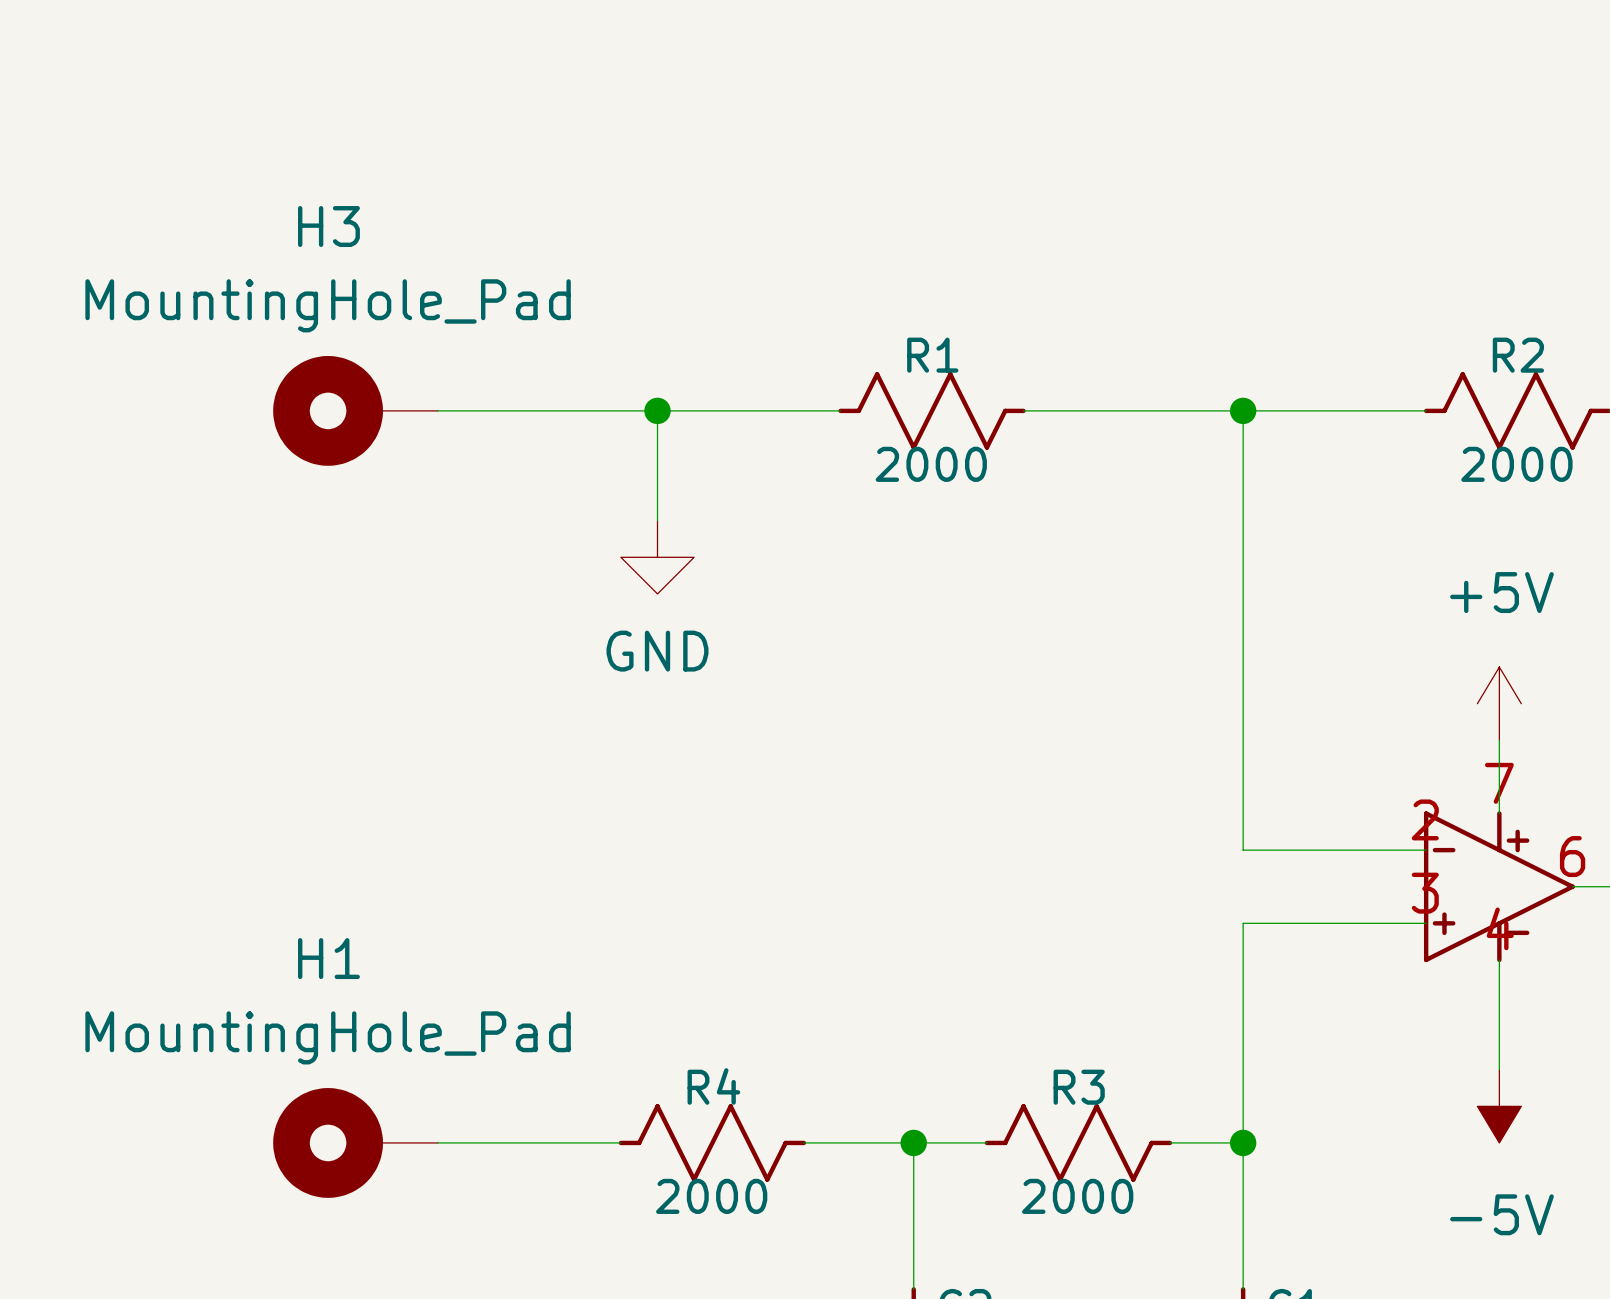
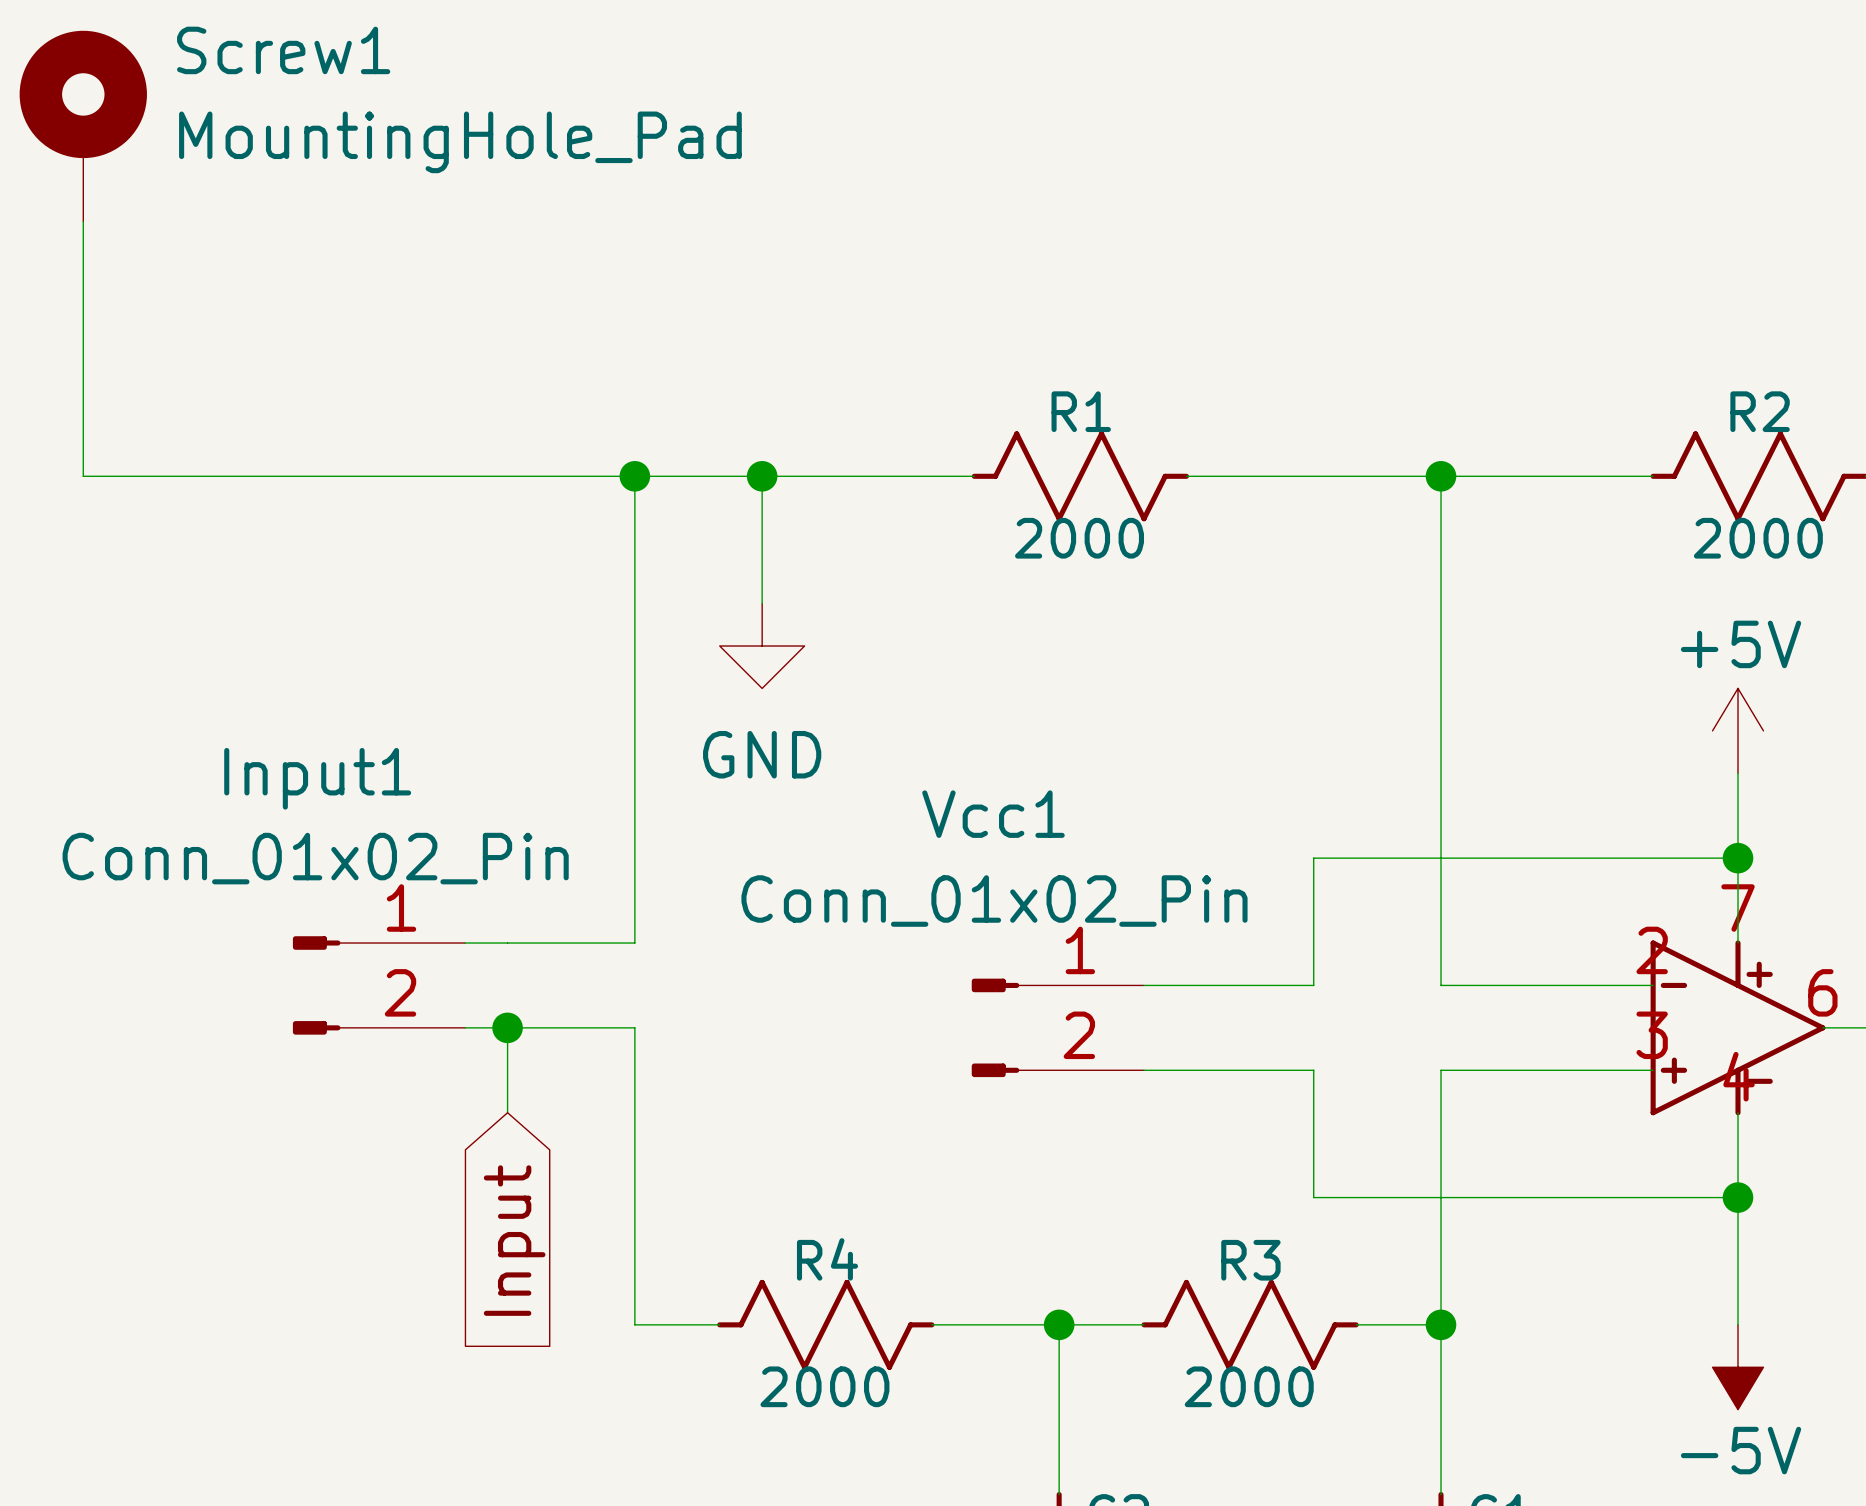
Screw1: none -> MountingHole_Pad (83, 126)
wire: none -> (83, 221) (83, 476) (507, 476)
H3: MountingHole_Pad (355, 410) -> none
wire: none -> (634, 476) (634, 943) (465, 943)
junction: none -> (634, 476)
power symbol text position: +5V (1501, 592) -> +5V (1741, 644)
wire: none -> (1738, 773) (1738, 858) (1313, 858) (1313, 985) (1144, 985)
power symbol position: +5V (1499, 703) -> +5V (1738, 730)
junction: none -> (1738, 858)
Input1: none -> Conn_01x02_Pin (379, 985)
wire: none -> (507, 1027) (507, 1112)
junction: none -> (507, 1027)
Vcc1: none -> Conn_01x02_Pin (1057, 1027)
wire: none -> (1144, 1070) (1313, 1070) (1313, 1197) (1738, 1197)
junction: none -> (1738, 1197)
global label: none -> Input (514, 1240)
power symbol position: -5V (1499, 1106) -> -5V (1738, 1367)
H1: MountingHole_Pad (355, 1142) -> none
wire: (437, 1142) (547, 1142) -> (465, 1027) (634, 1027) (634, 1324)
power symbol text position: -5V (1501, 1214) -> -5V (1741, 1450)

